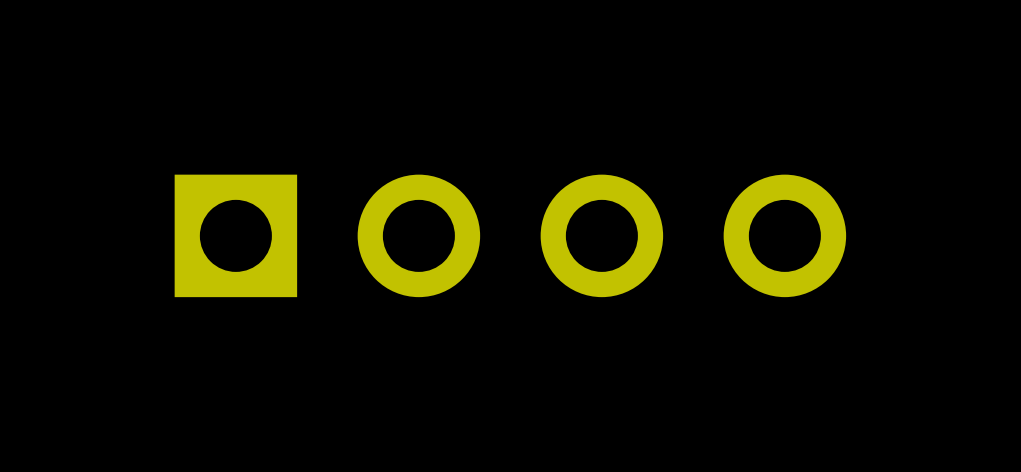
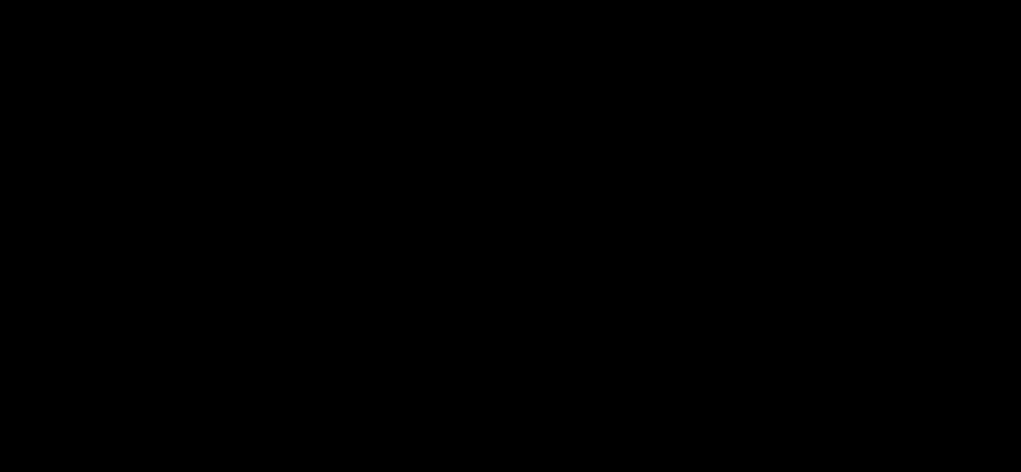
part: (510, 235) -> none

